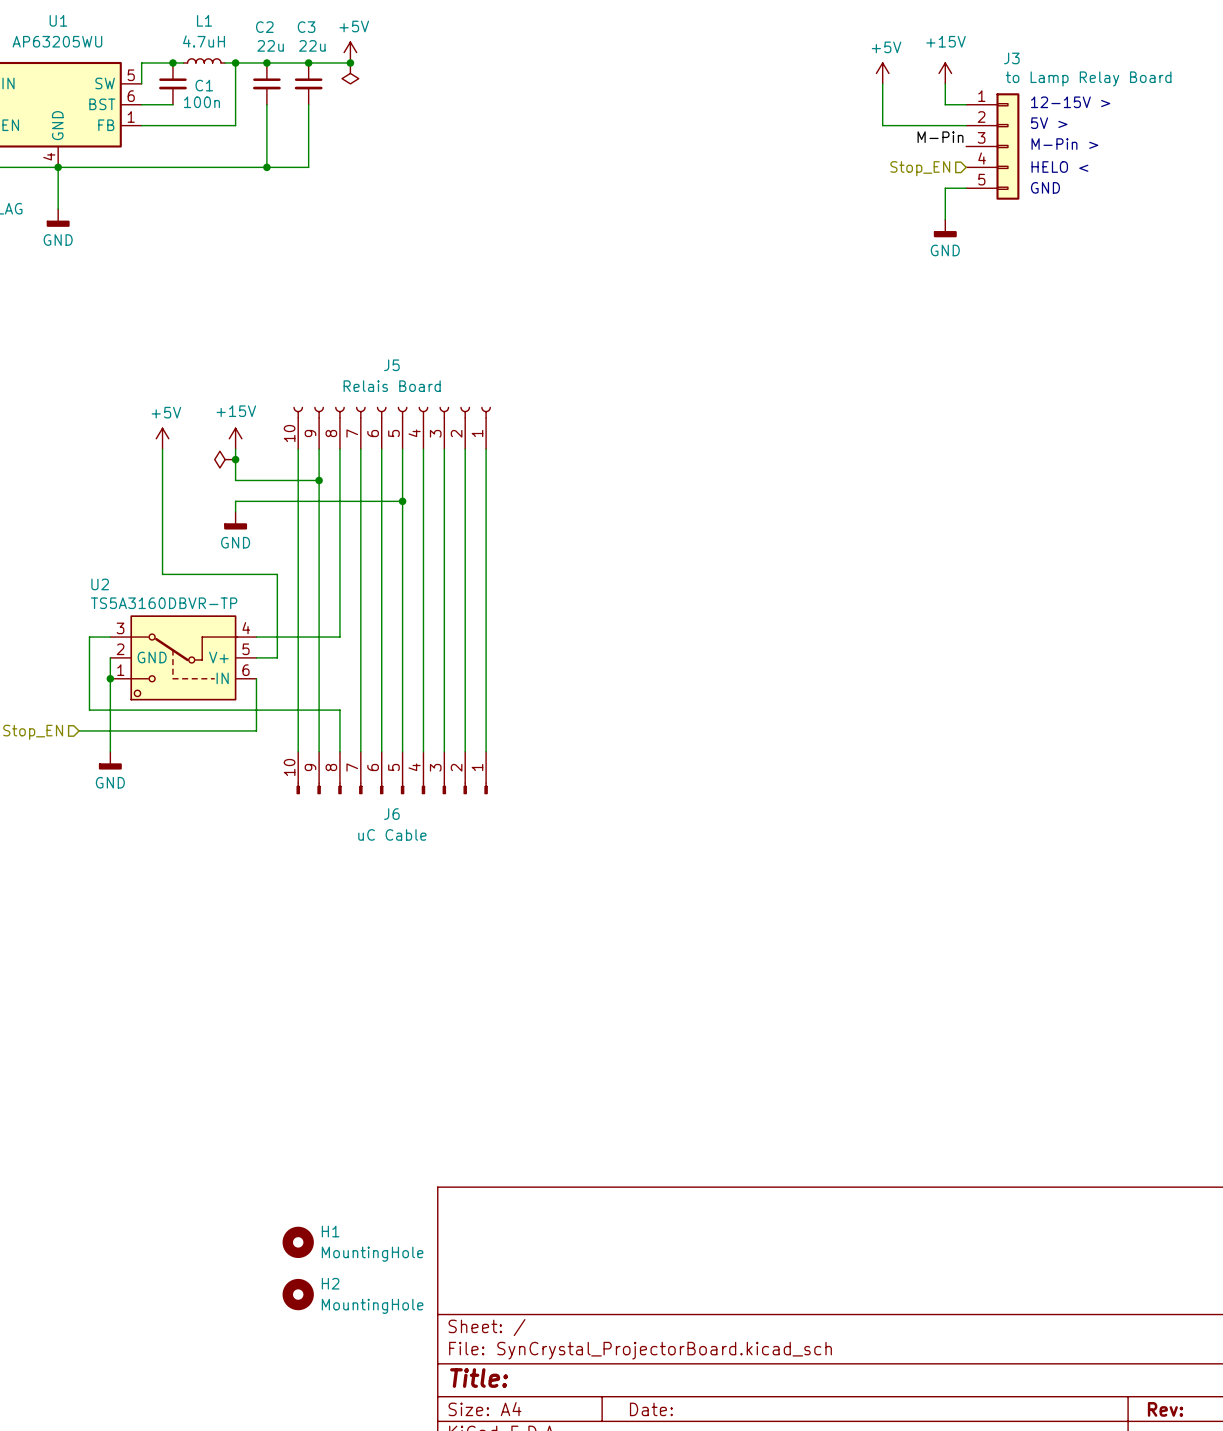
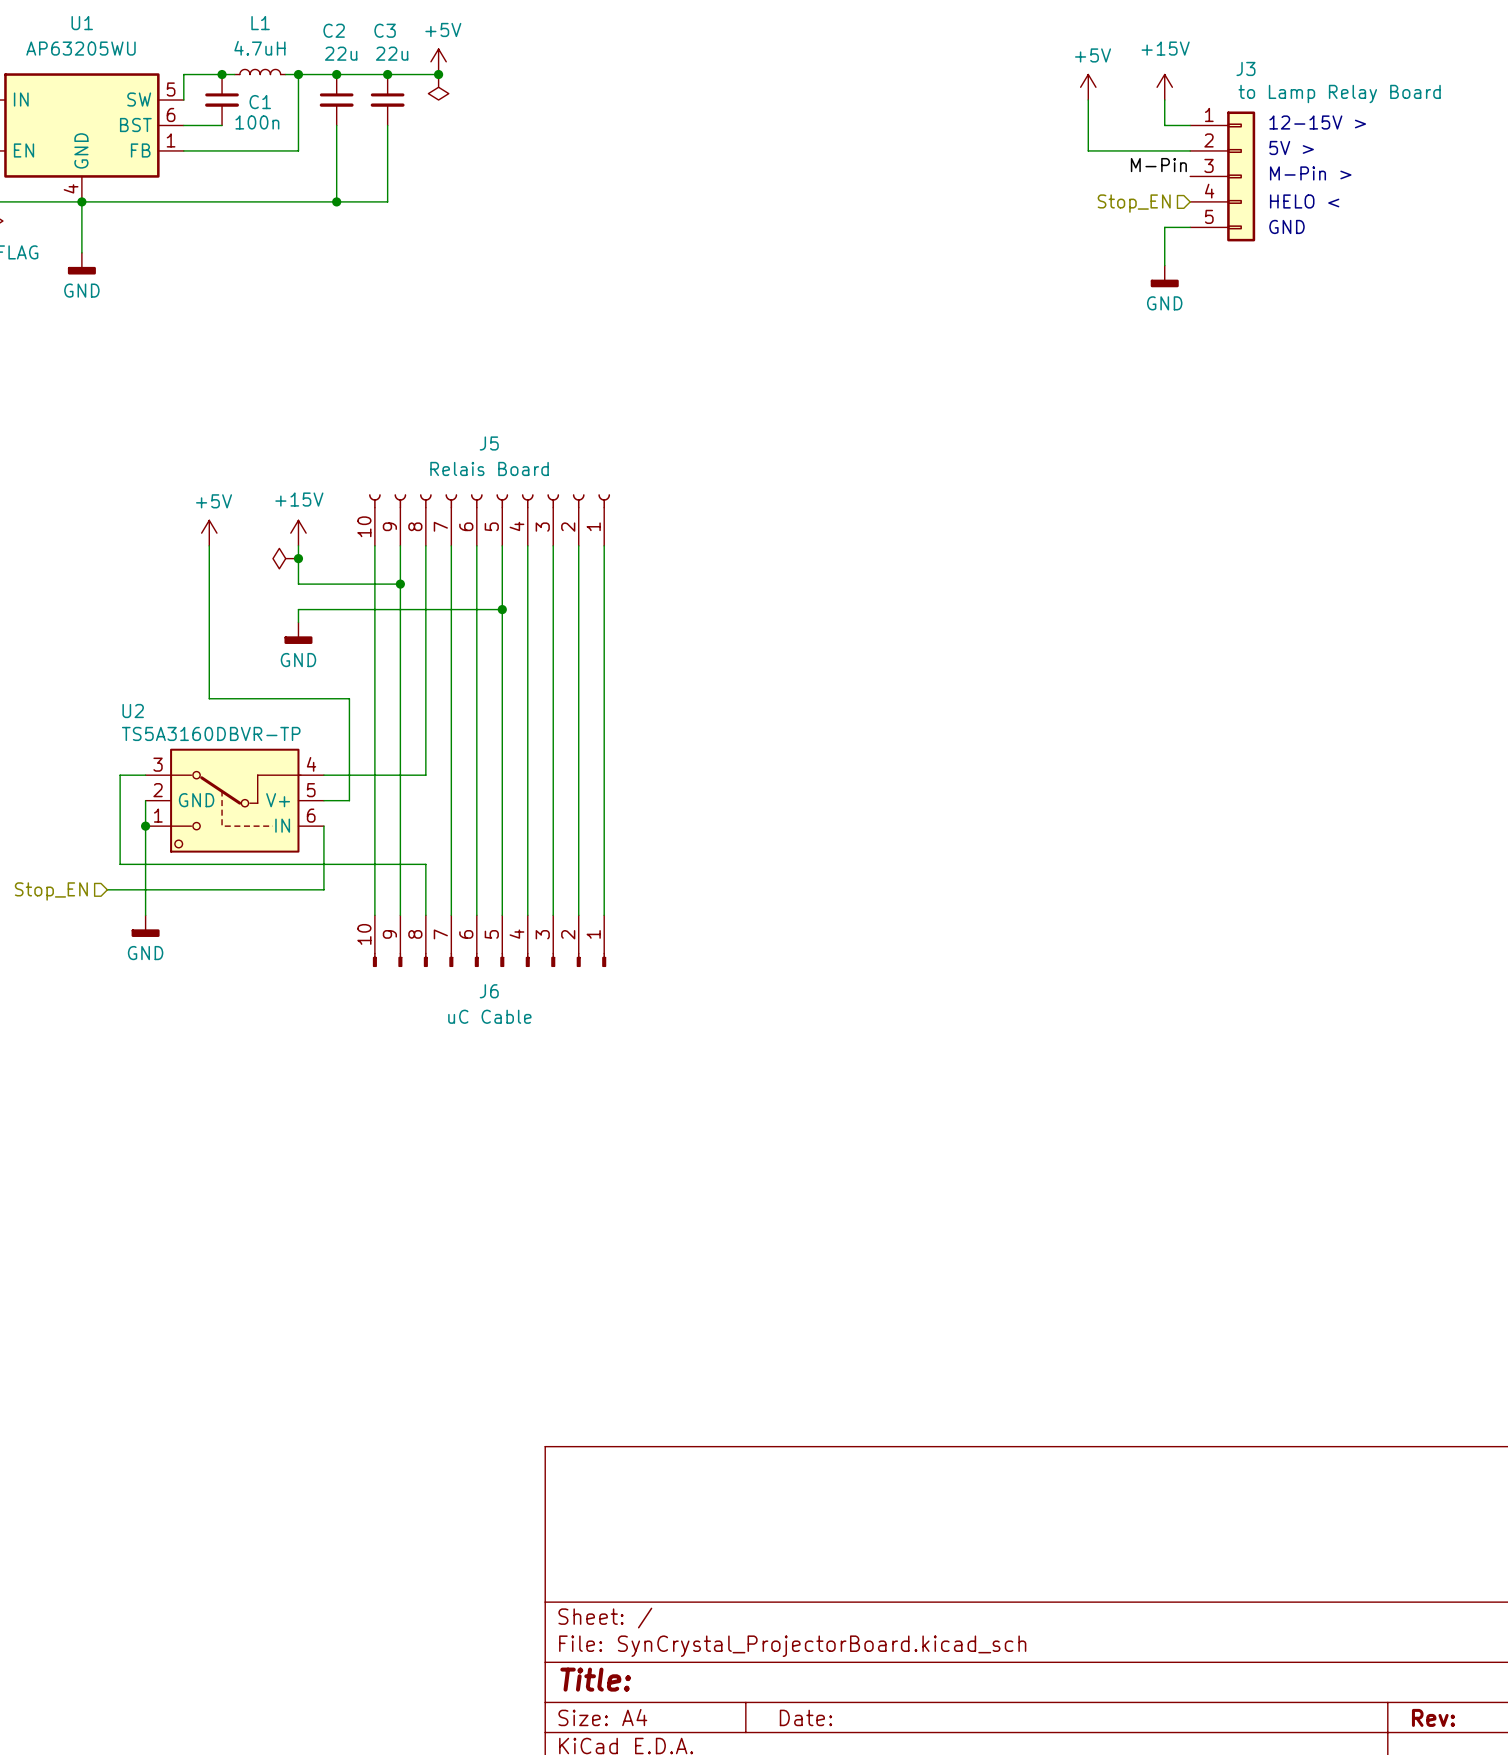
H1: MountingHole (298, 1242) -> none
H2: MountingHole (298, 1294) -> none

